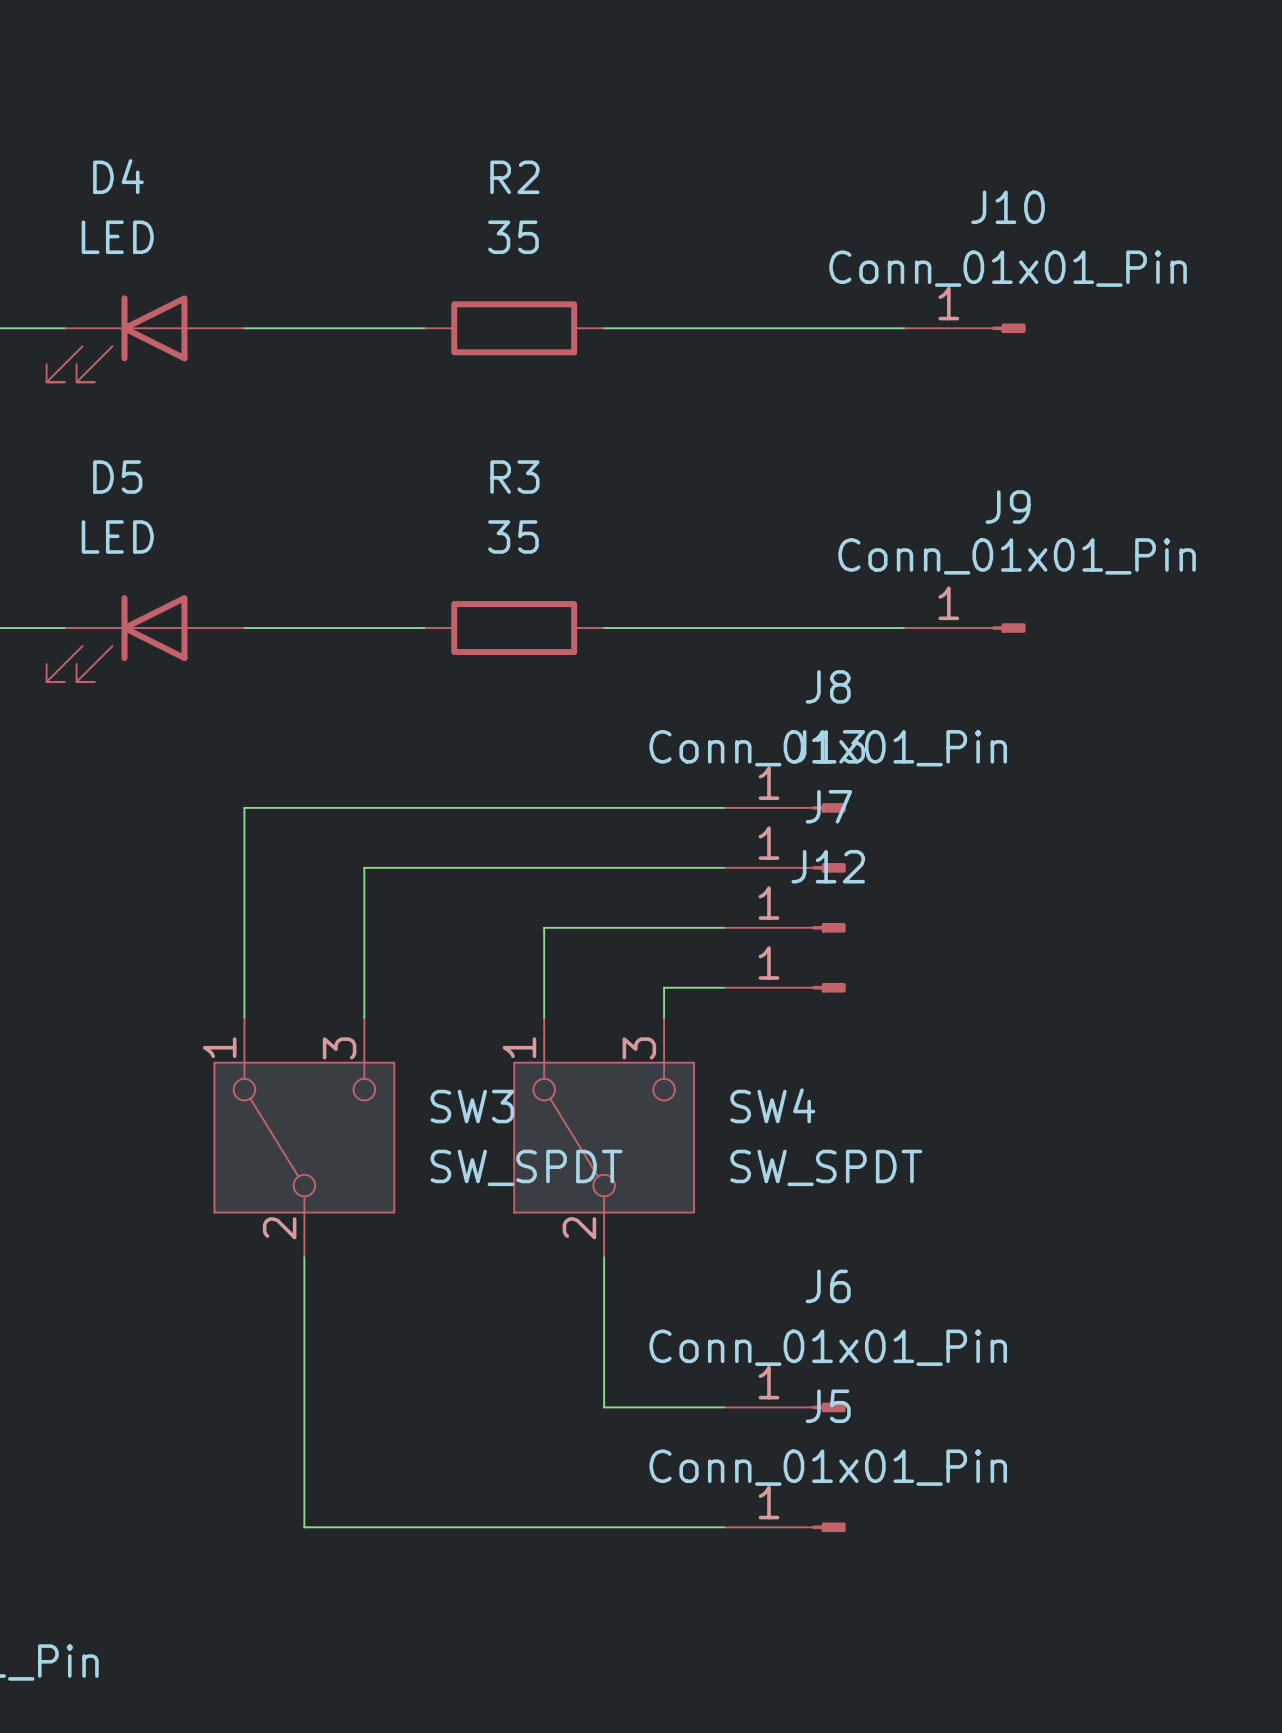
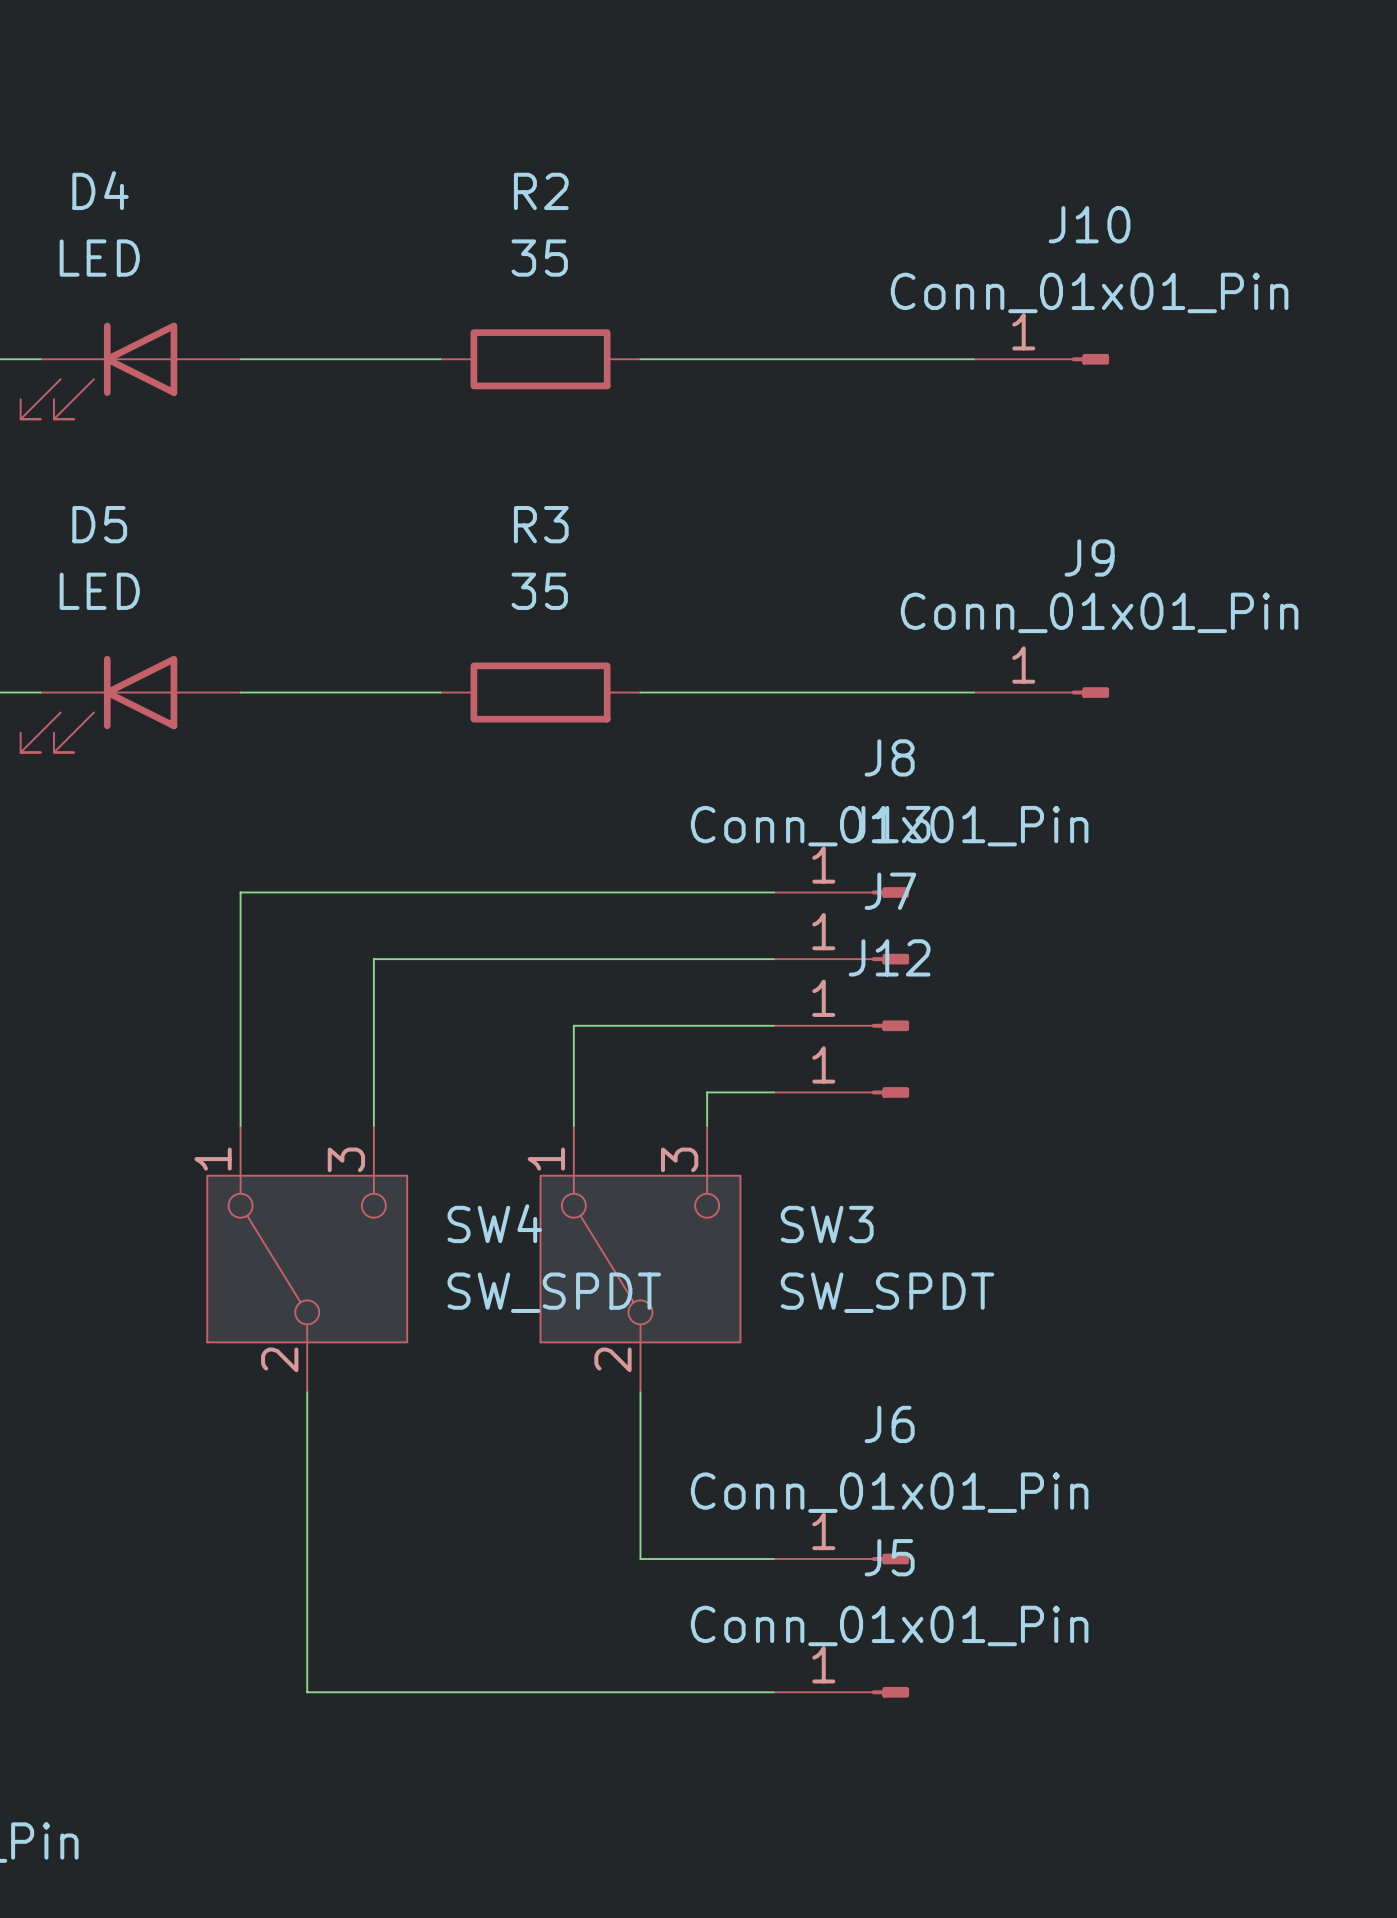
SW4 name: SW4 (772, 1105) -> SW3 (827, 1224)
SW3 name: SW3 (472, 1106) -> SW4 (494, 1223)

